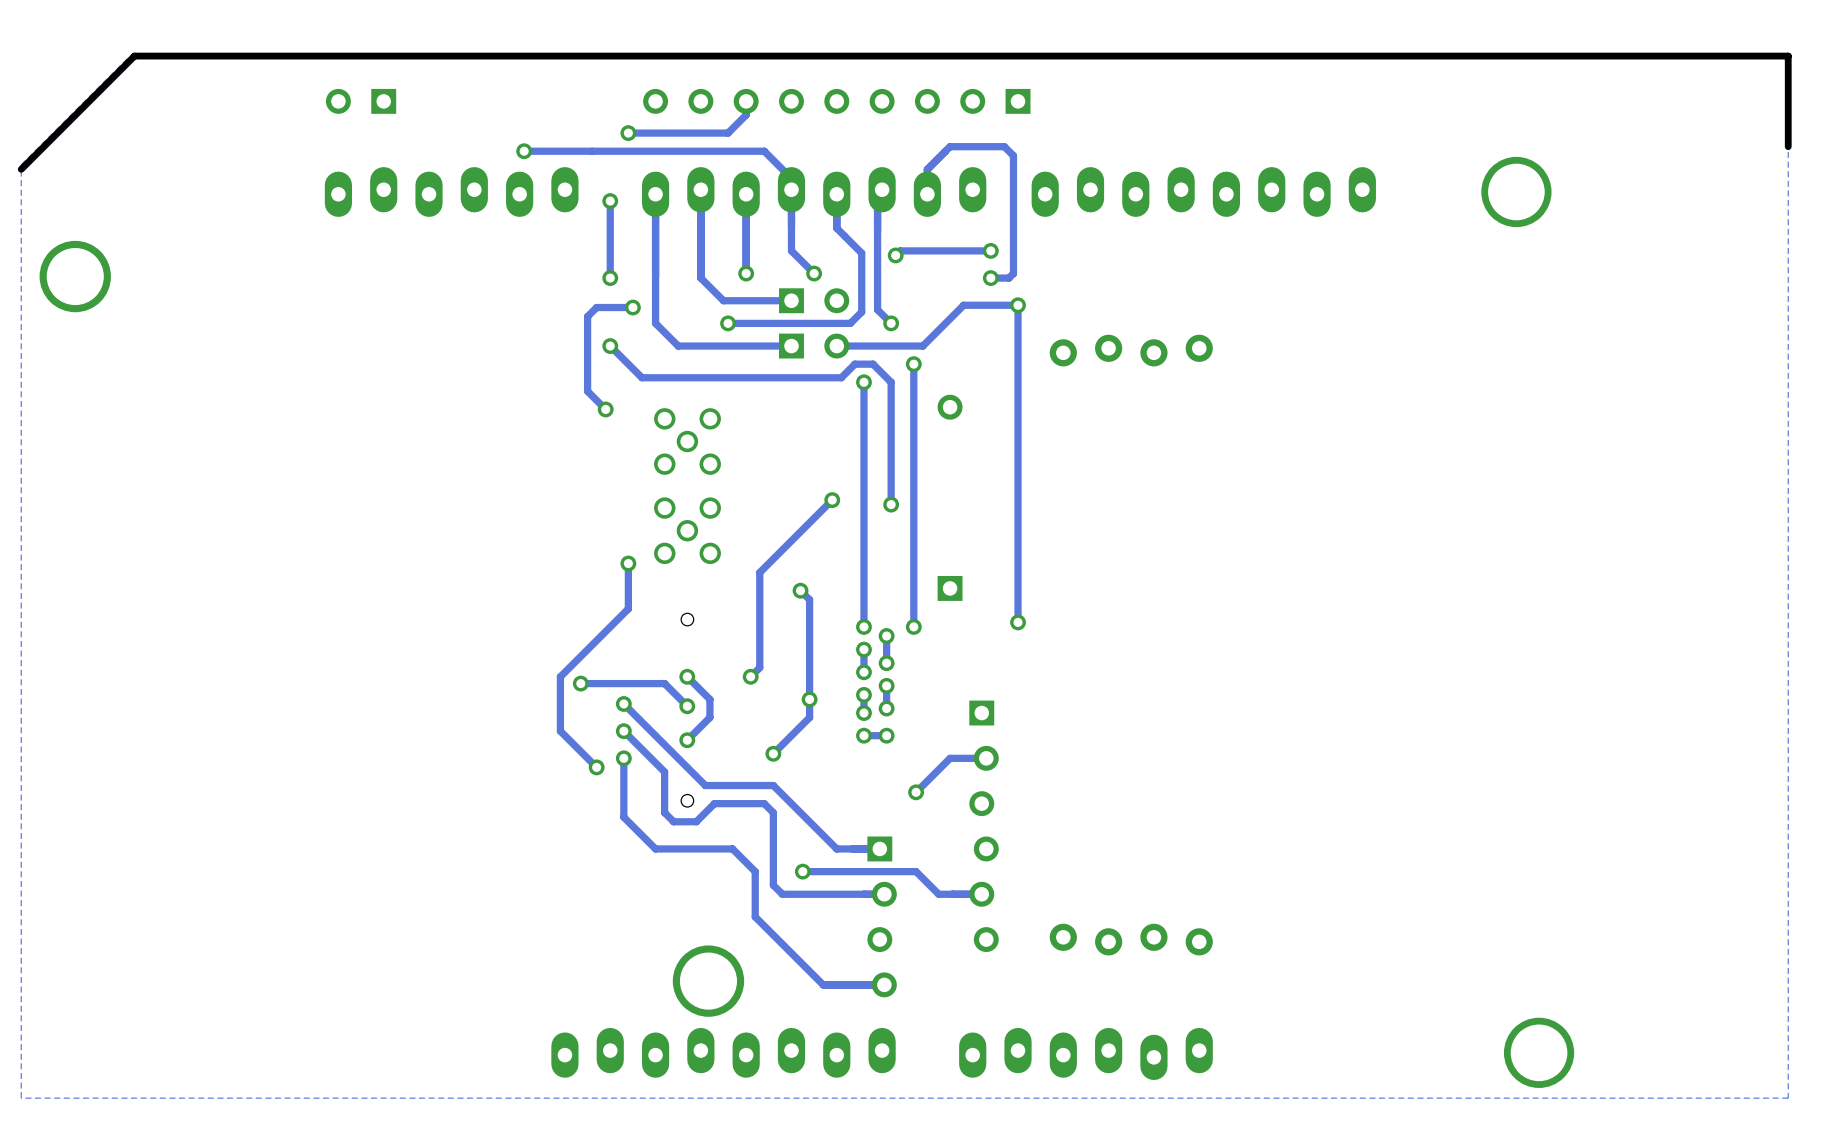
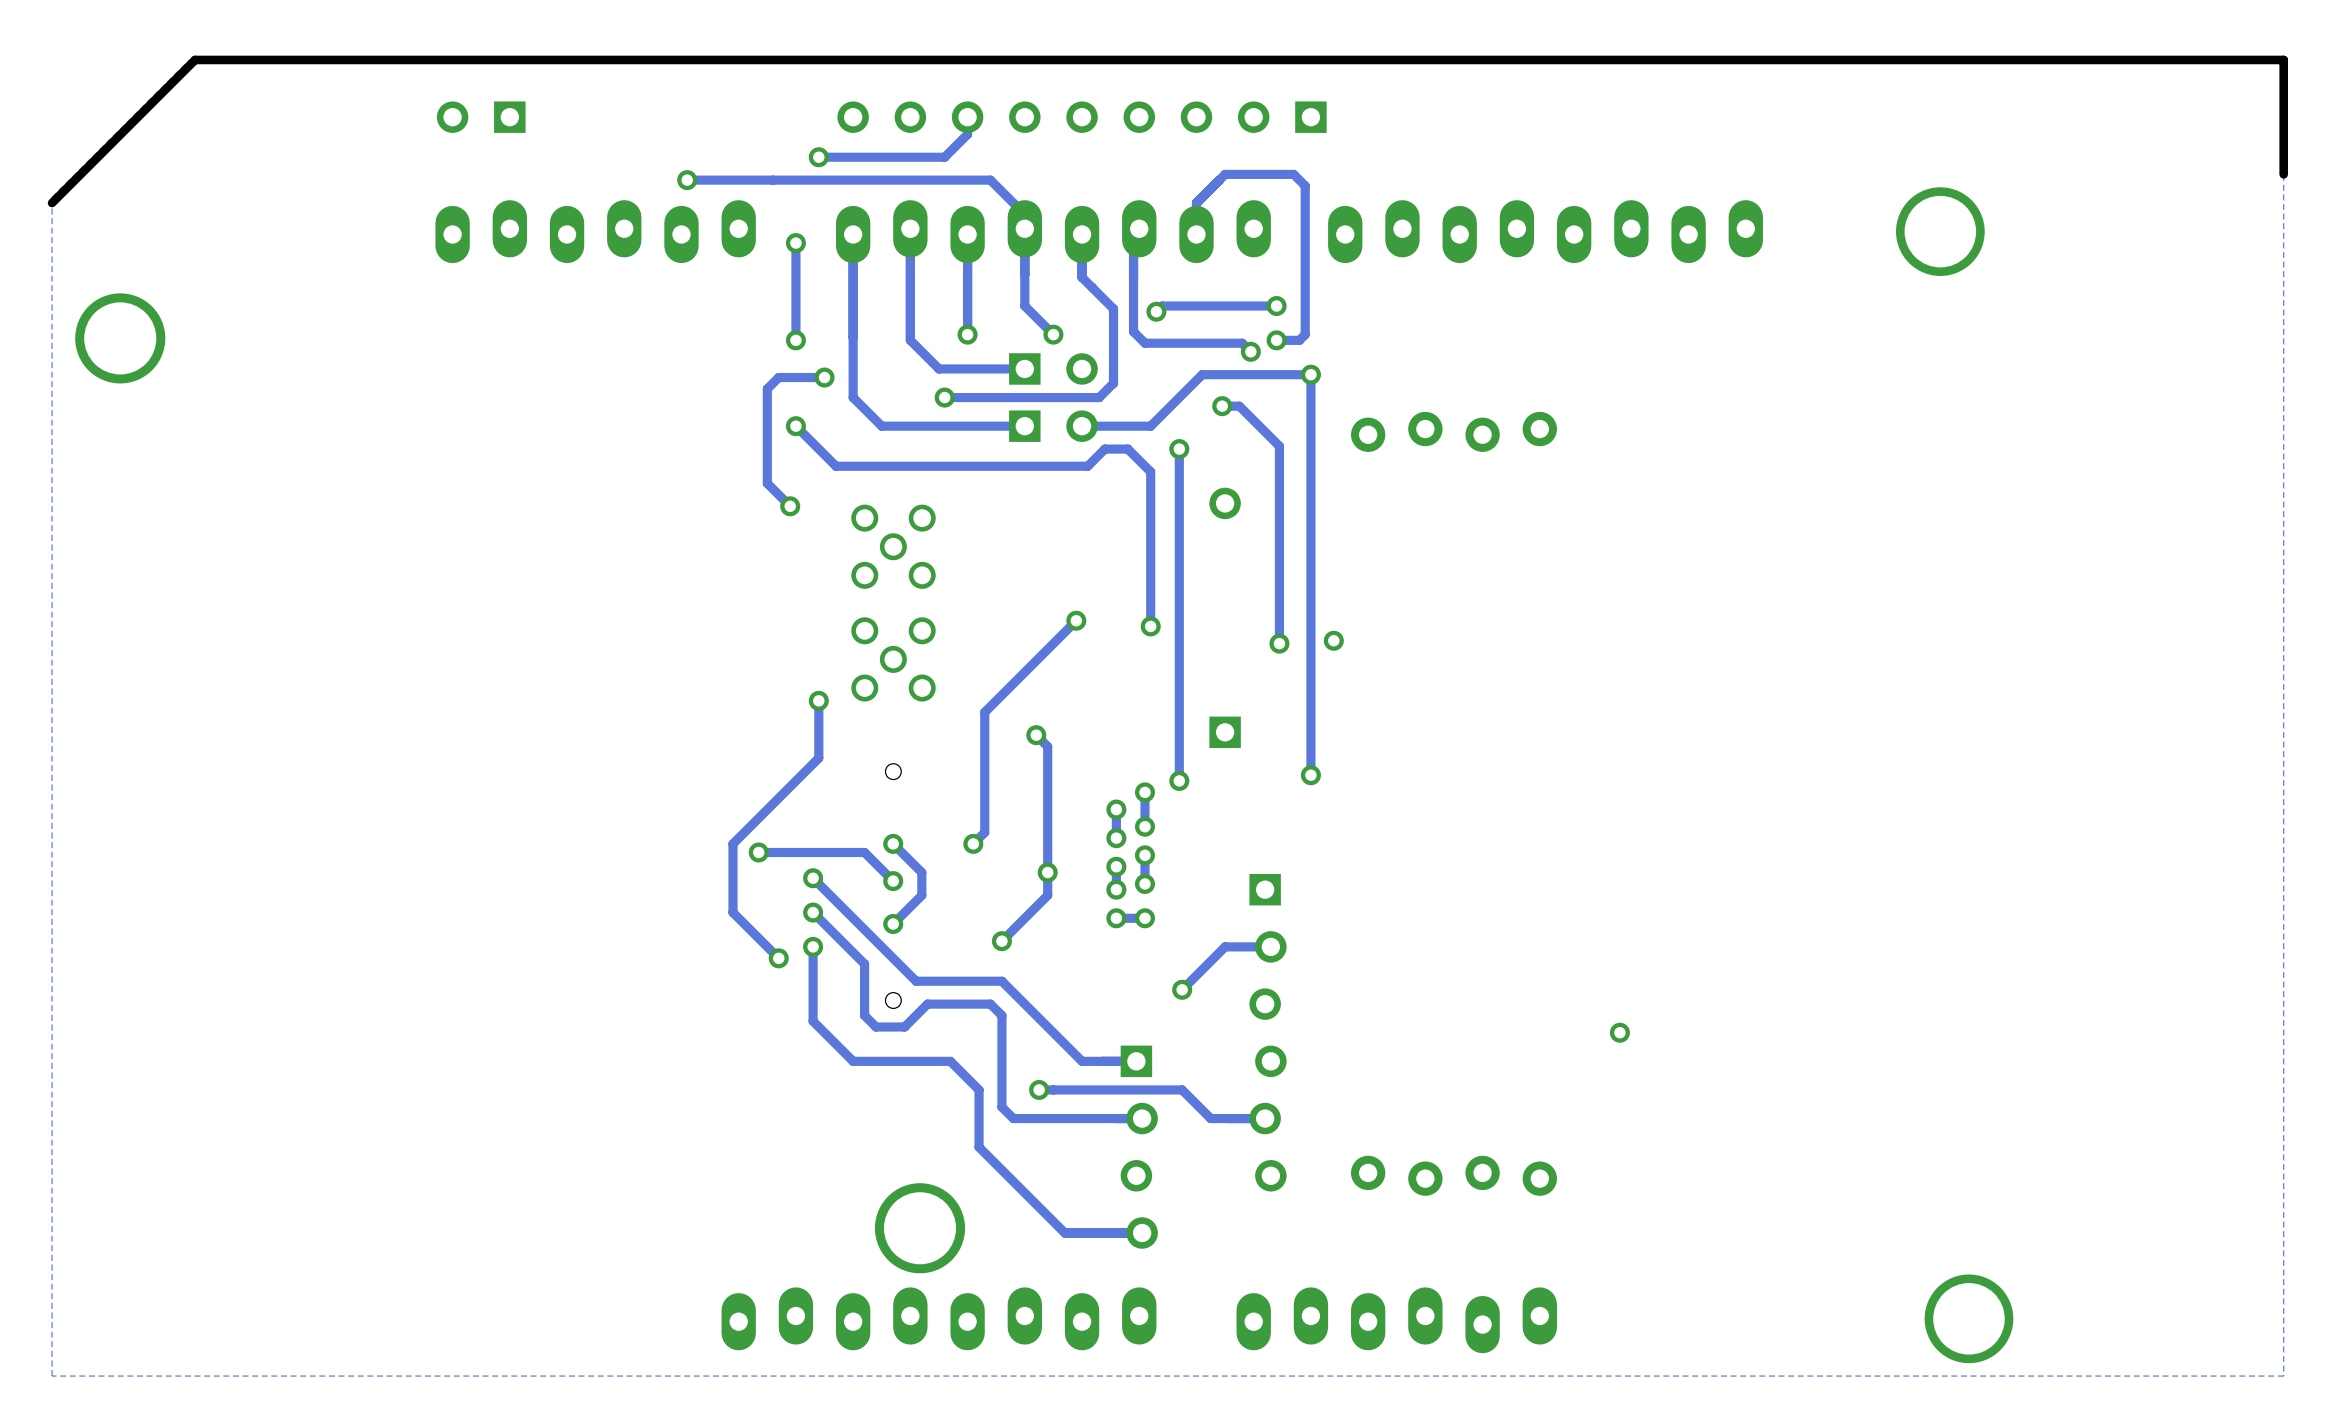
track: (877, 271) (877, 309) (891, 323) -> (1133, 331) (1144, 343) (1242, 343) (1250, 351)
via: none -> (1250, 351)
track: (963, 305) (922, 346) (891, 346) -> (1242, 374) (1202, 374) (1150, 426)
via: (891, 323) -> none
track: none -> (1222, 406) (1239, 406) (1279, 446) (1279, 643)
via: none -> (1222, 406)
track: (863, 382) (863, 626) -> none
via: (863, 382) -> none
via: none -> (1333, 640)
via: none -> (1279, 643)
via: (863, 626) -> none
via: none -> (1619, 1032)

